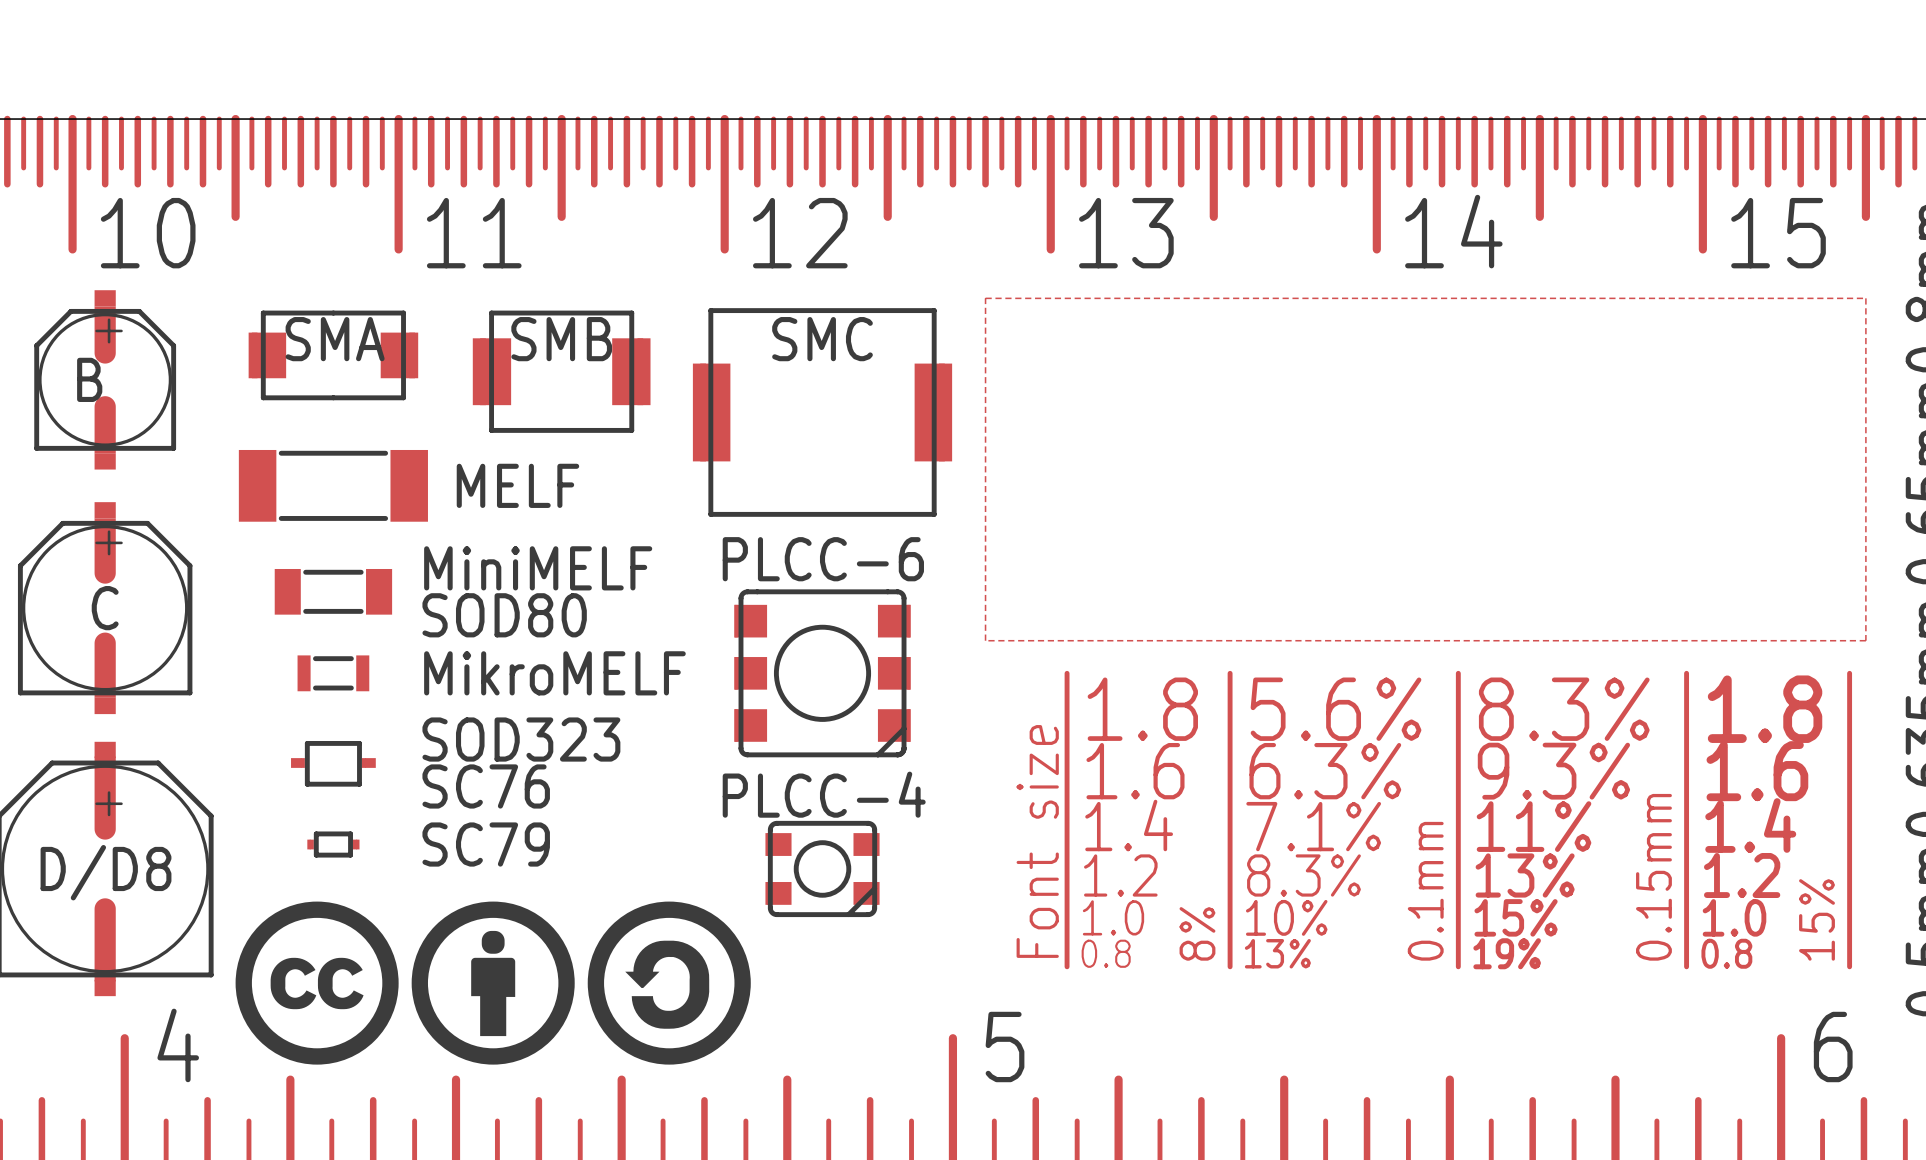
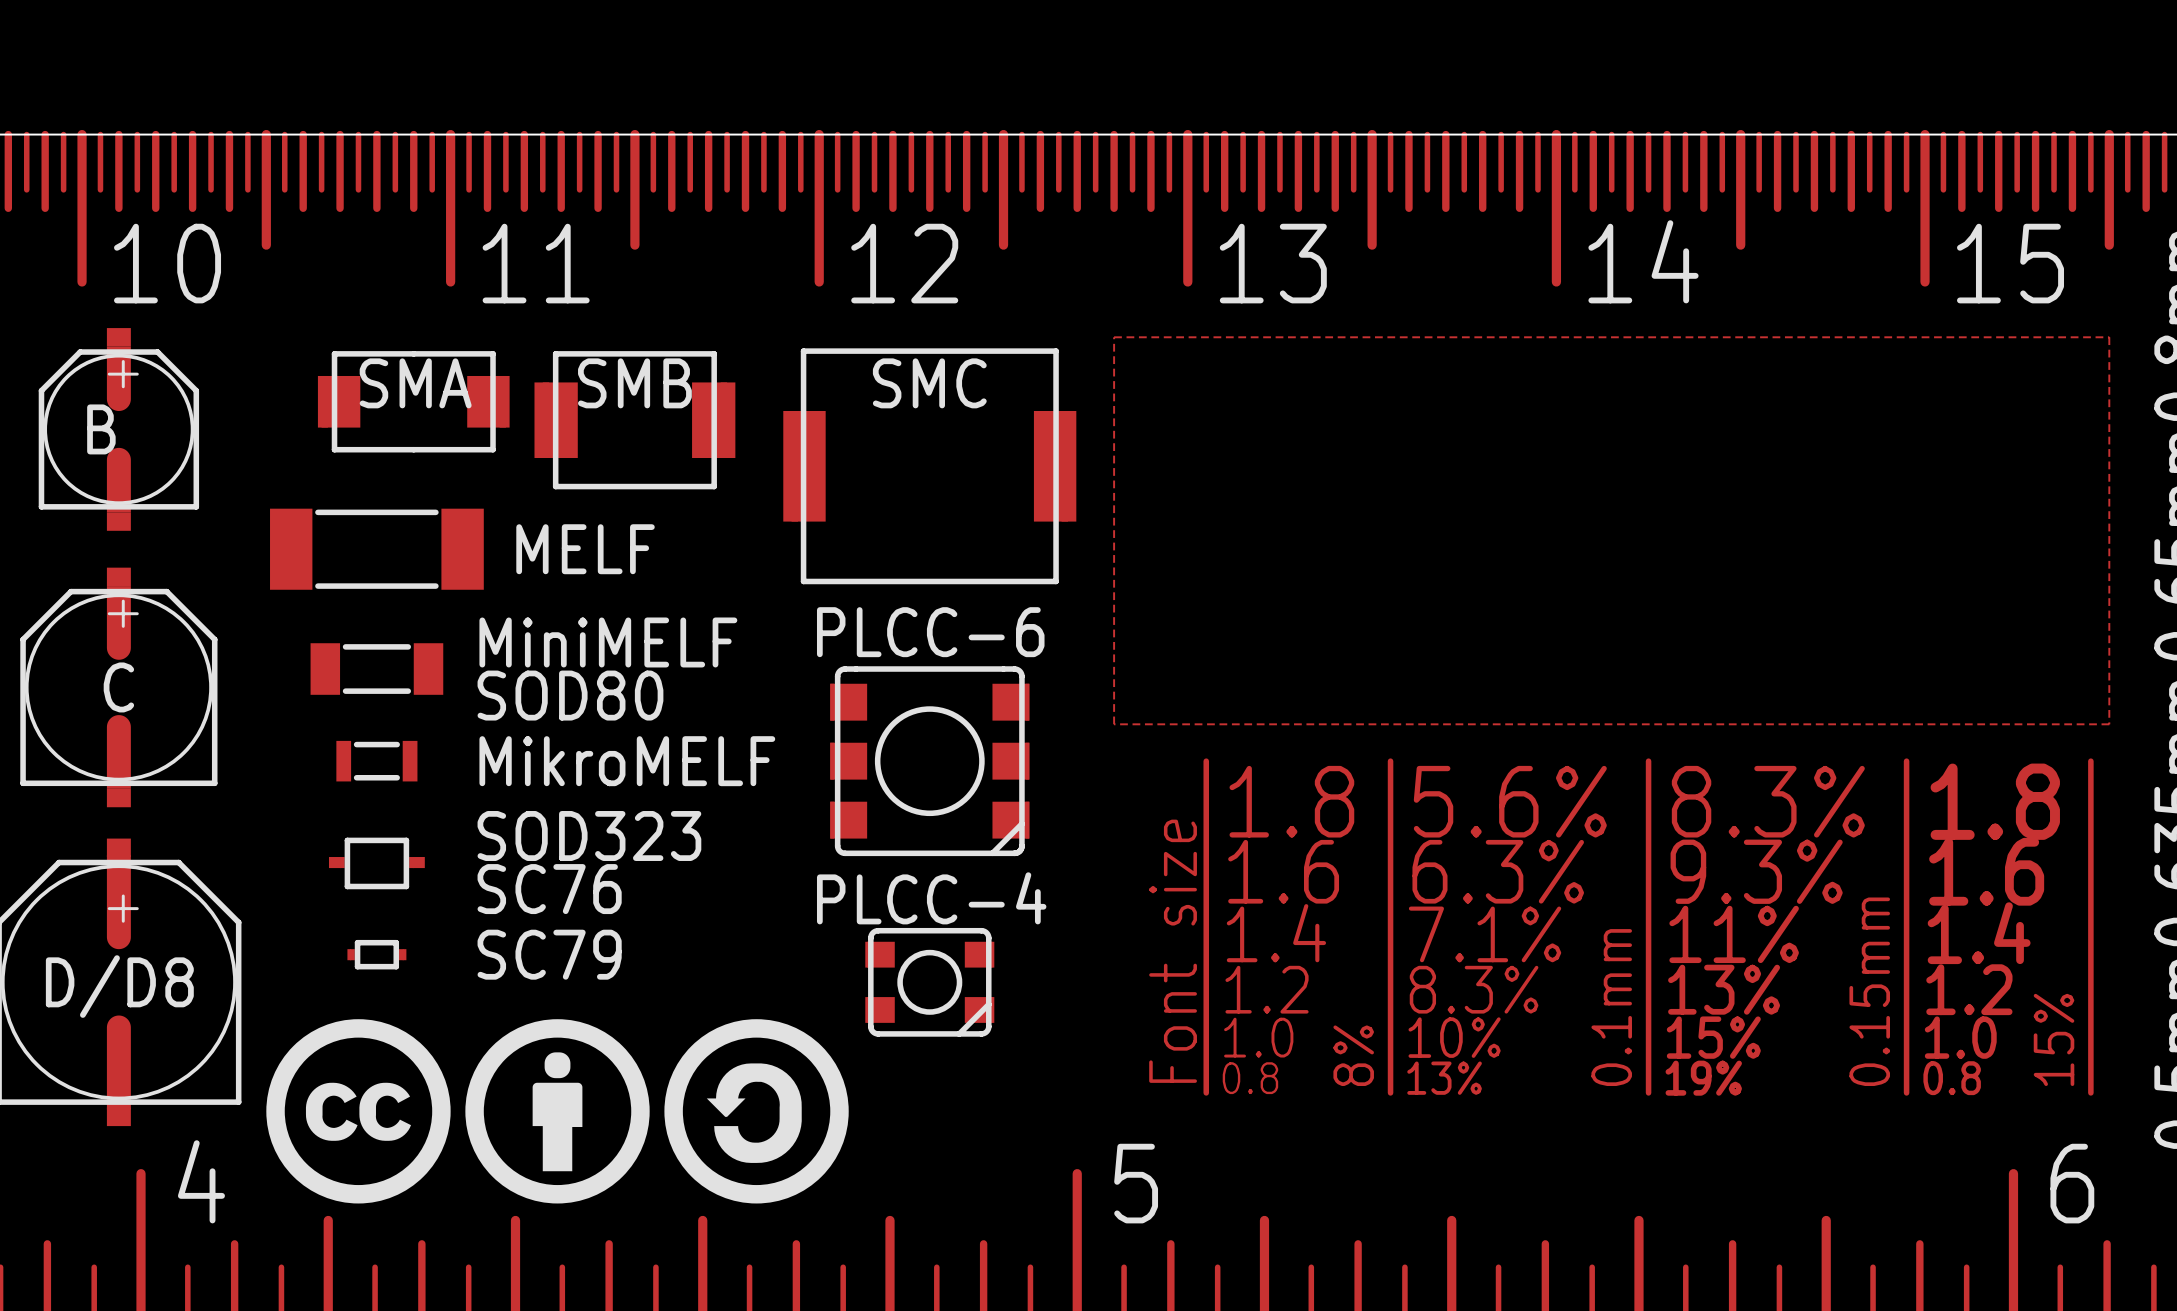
text position: SMA (335, 339) -> SMA (415, 383)
part position: (333, 355) -> (413, 401)

